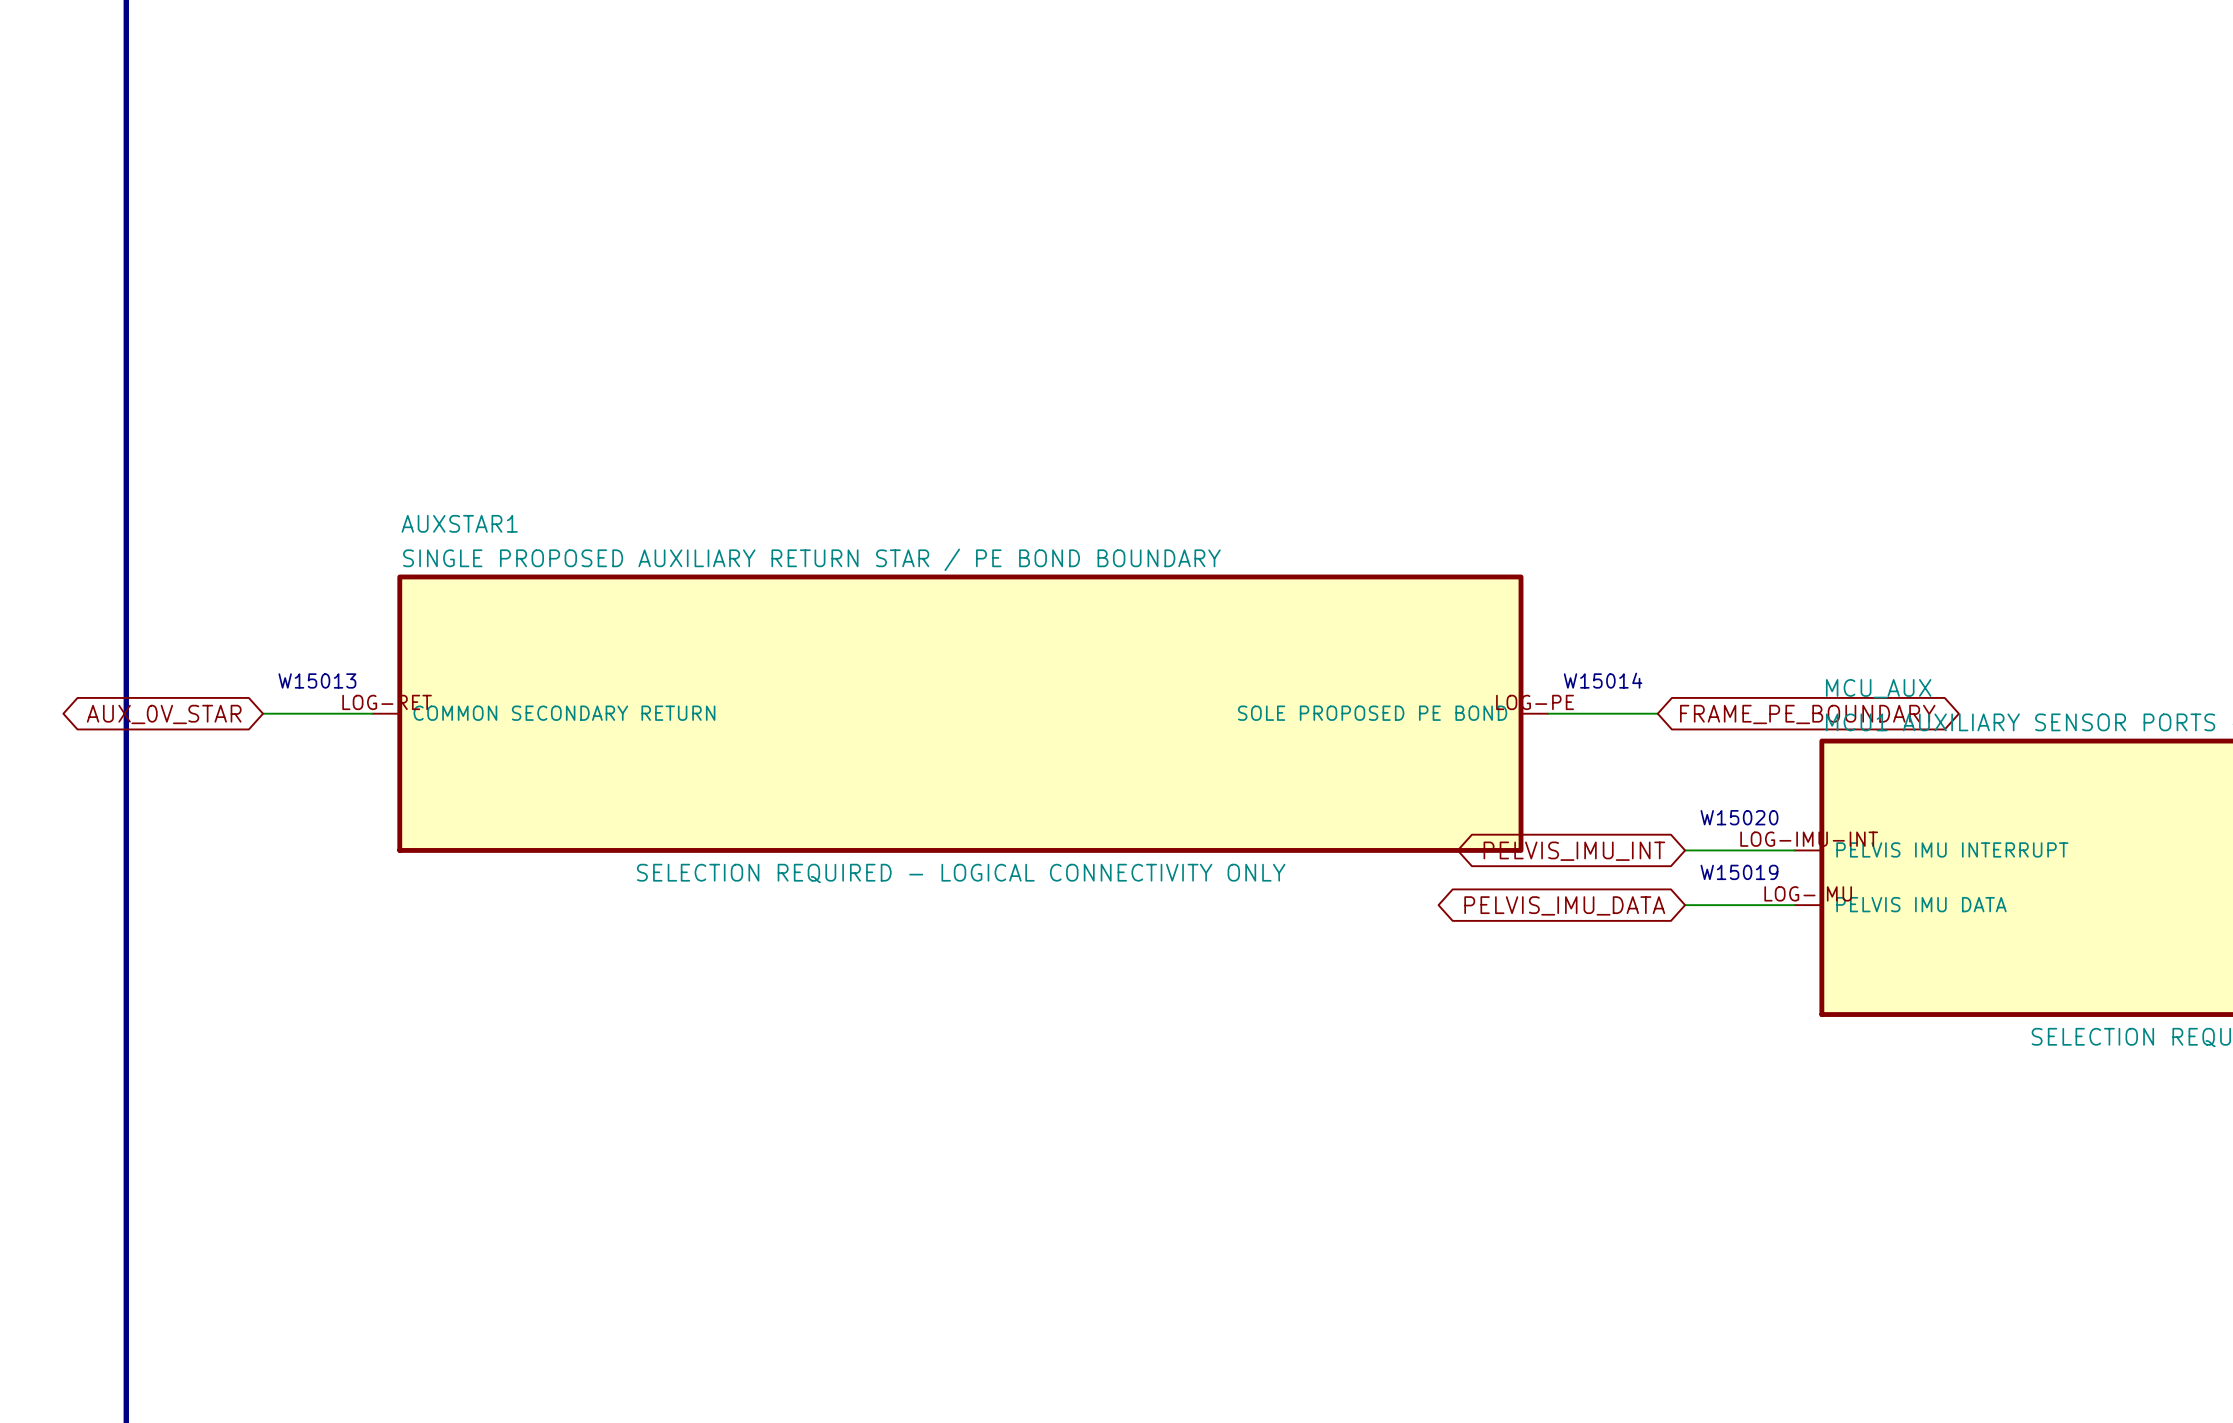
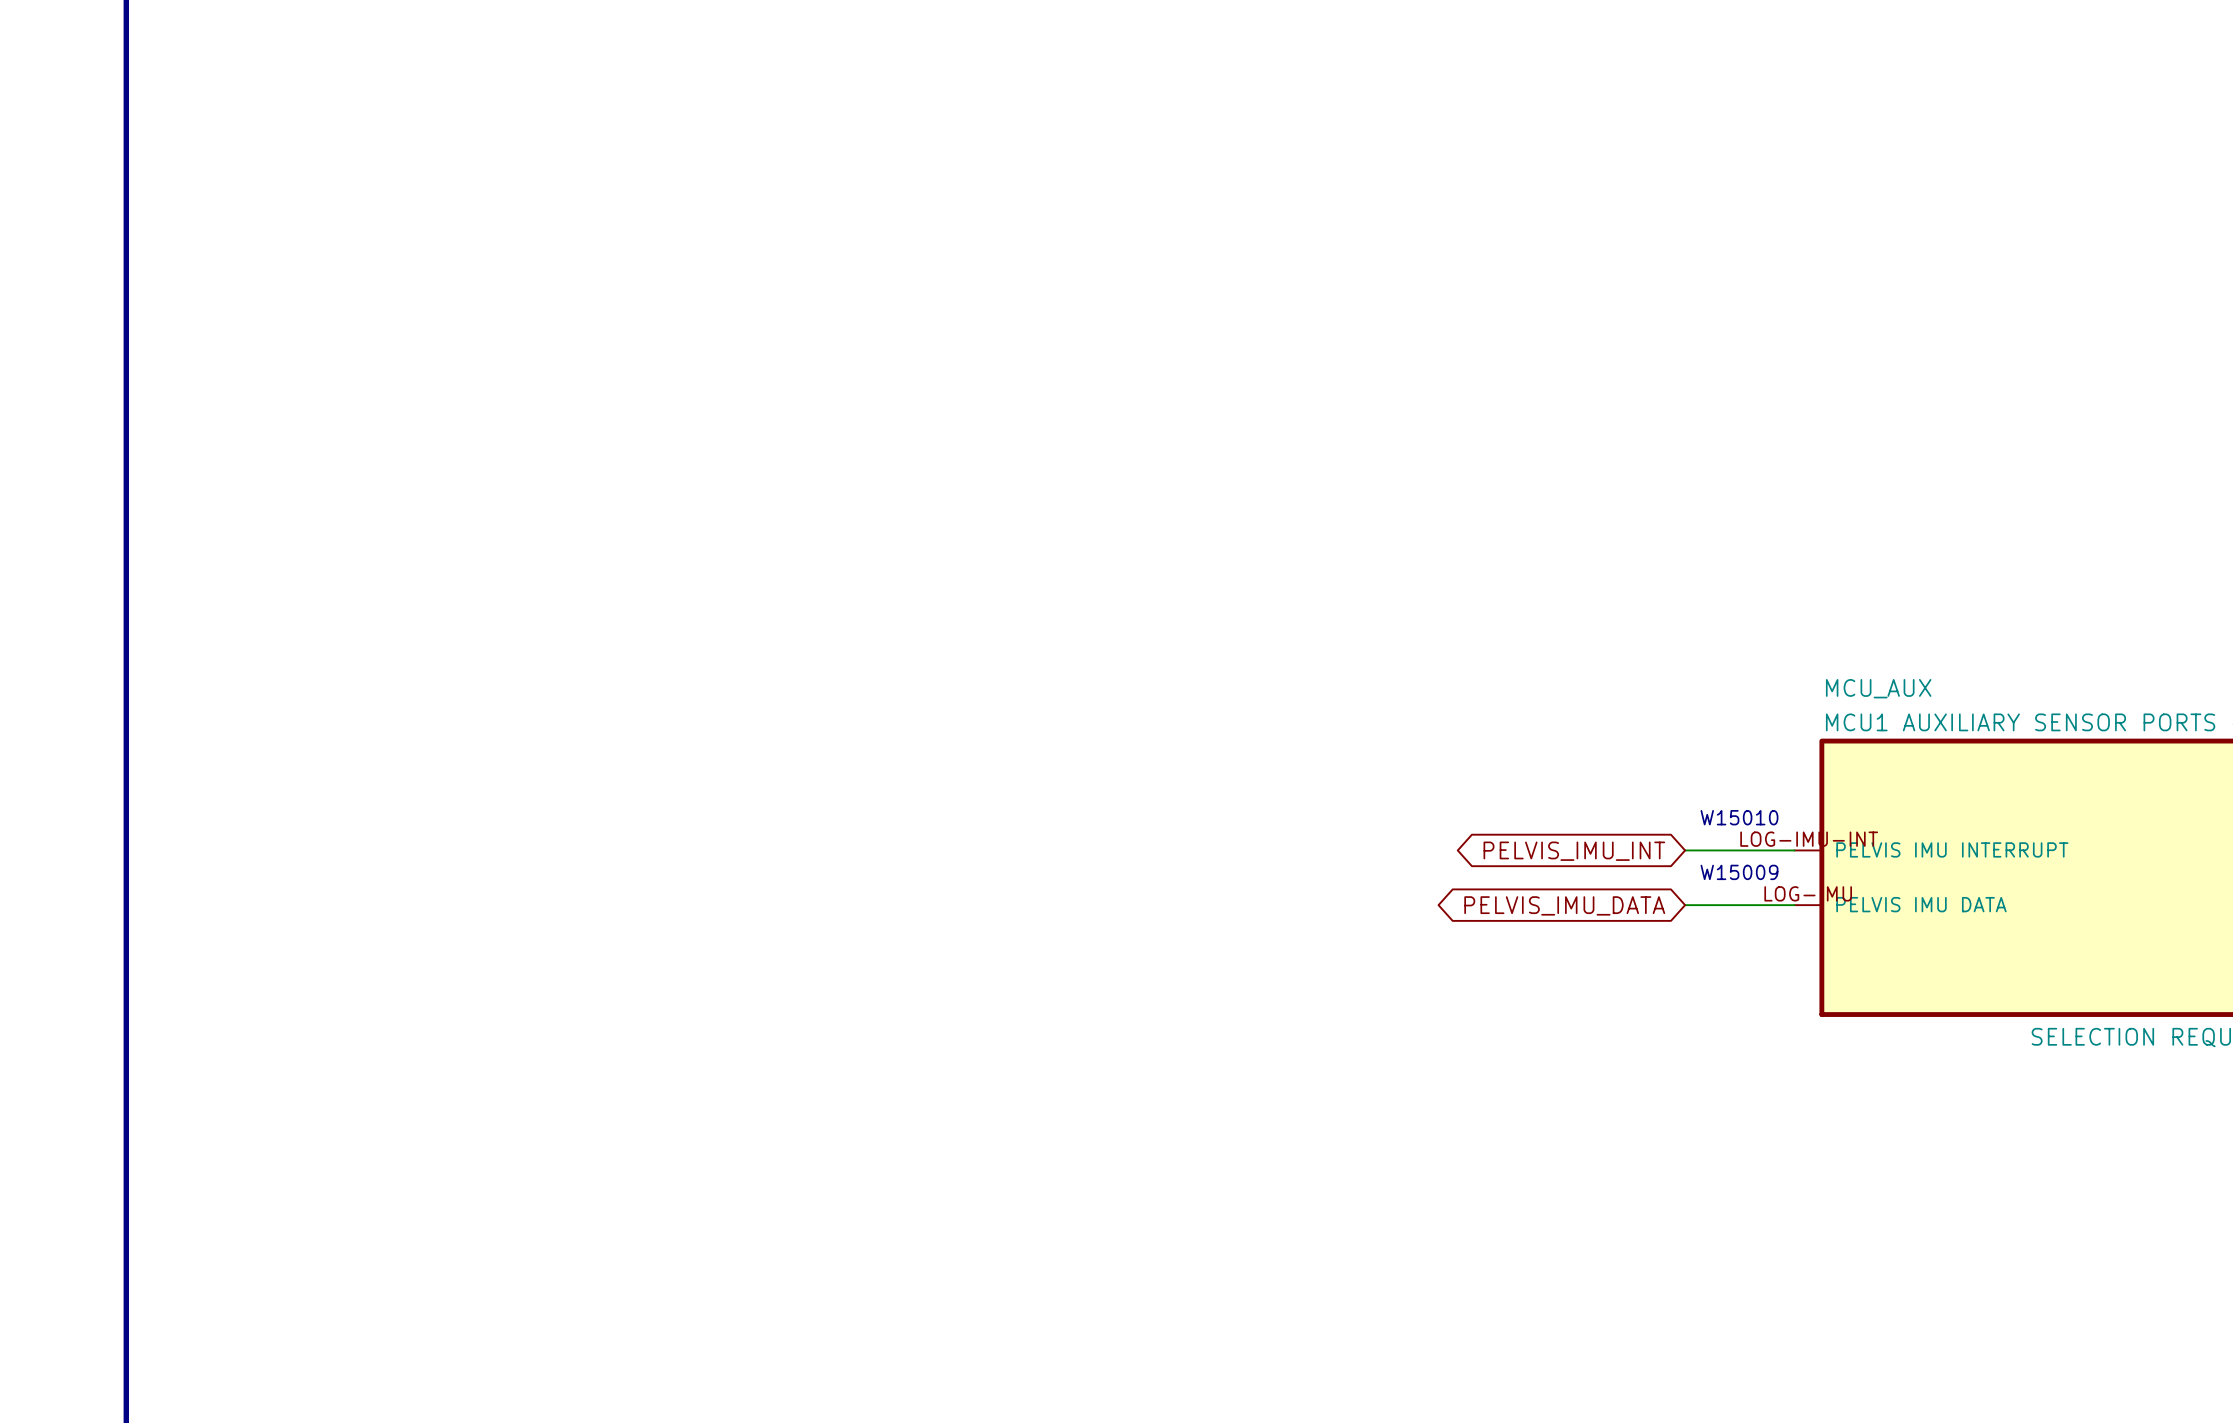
text: W15013 (317, 680) -> none
text: W15014 (1603, 680) -> none
wire: (263, 713) (372, 713) -> none
AUXSTAR1: (960, 713) -> none
wire: (1548, 713) (1657, 713) -> none
global label: AUX_0V_STAR (164, 714) -> none
global label: FRAME_PE_BOUNDARY (1807, 714) -> none
text: W15020 (1739, 817) -> W15010 (1739, 817)
text: W15019 (1739, 872) -> W15009 (1739, 872)

